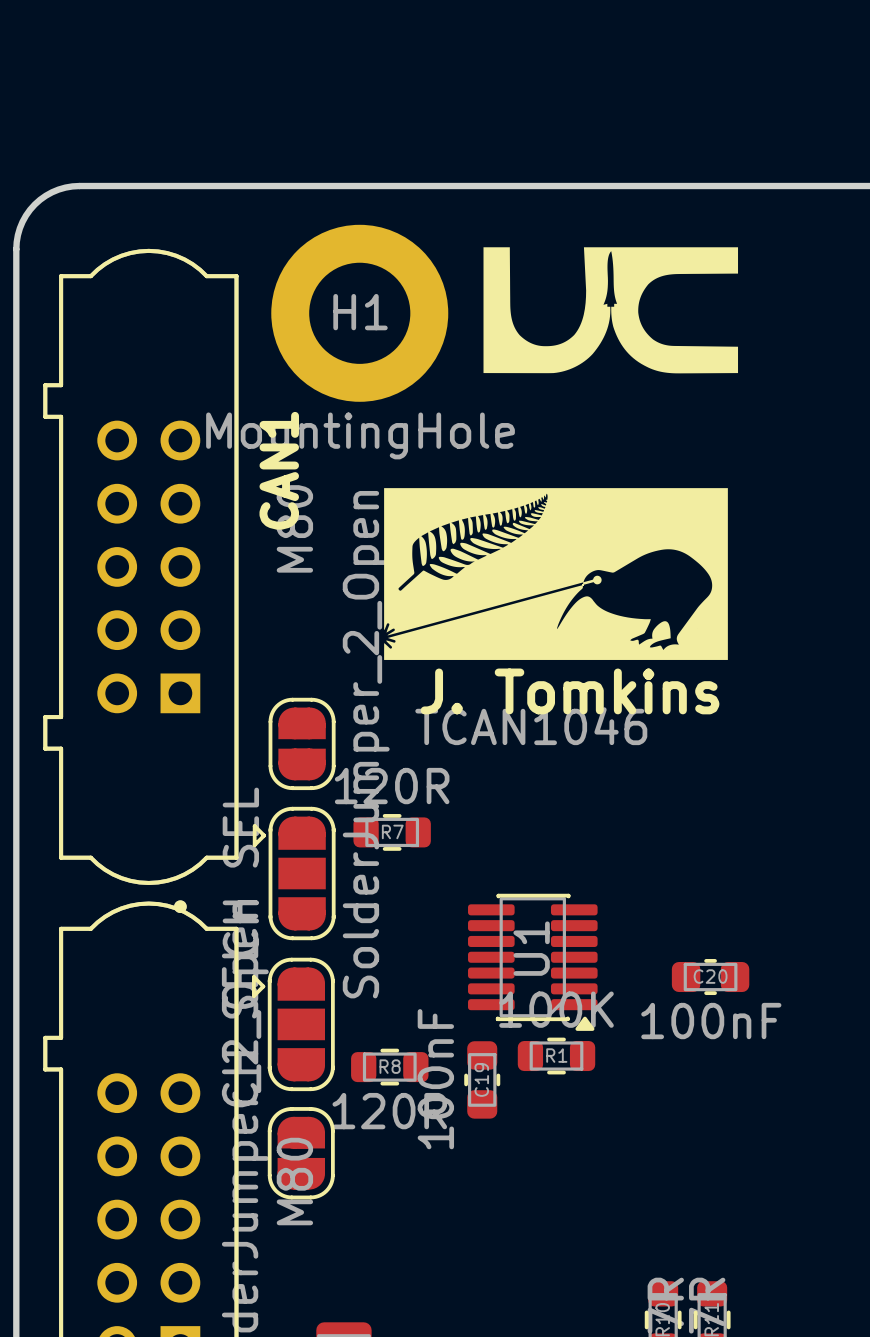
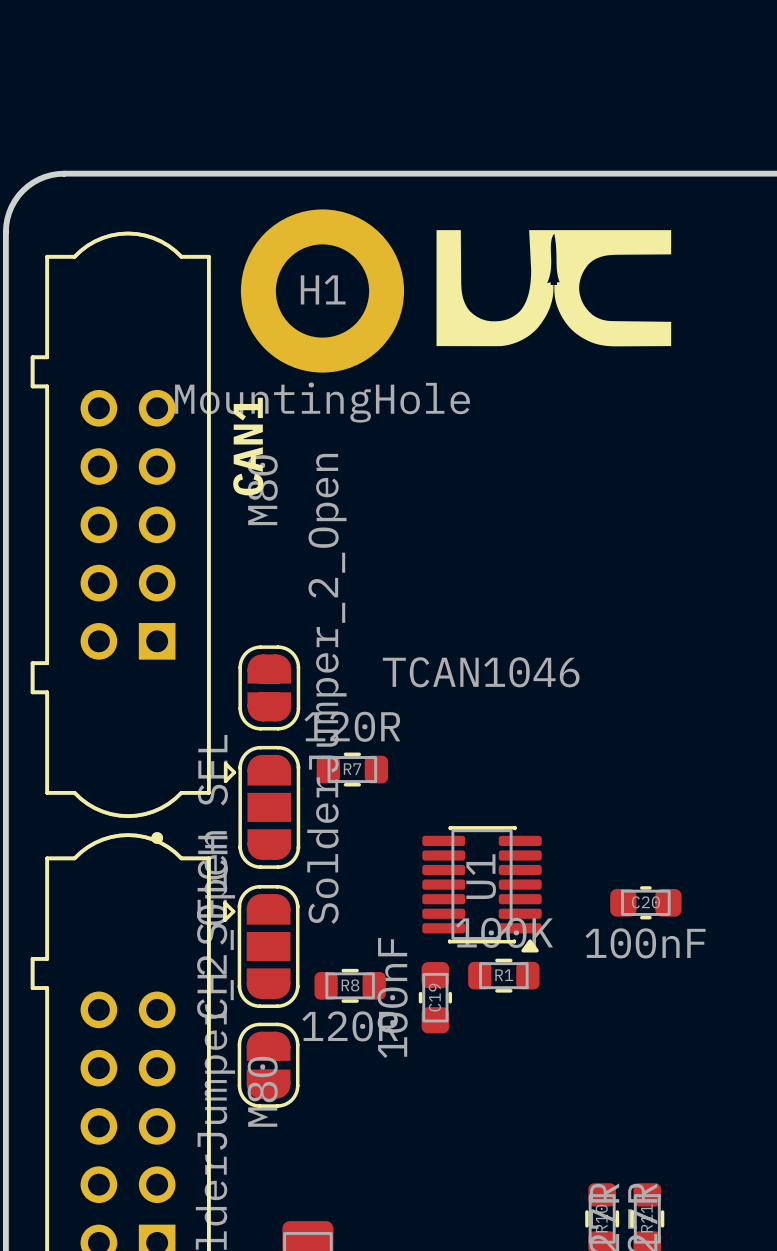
drawing: [384, 488, 728, 660] -> none
text: J. Tomkins (570, 691) -> none

